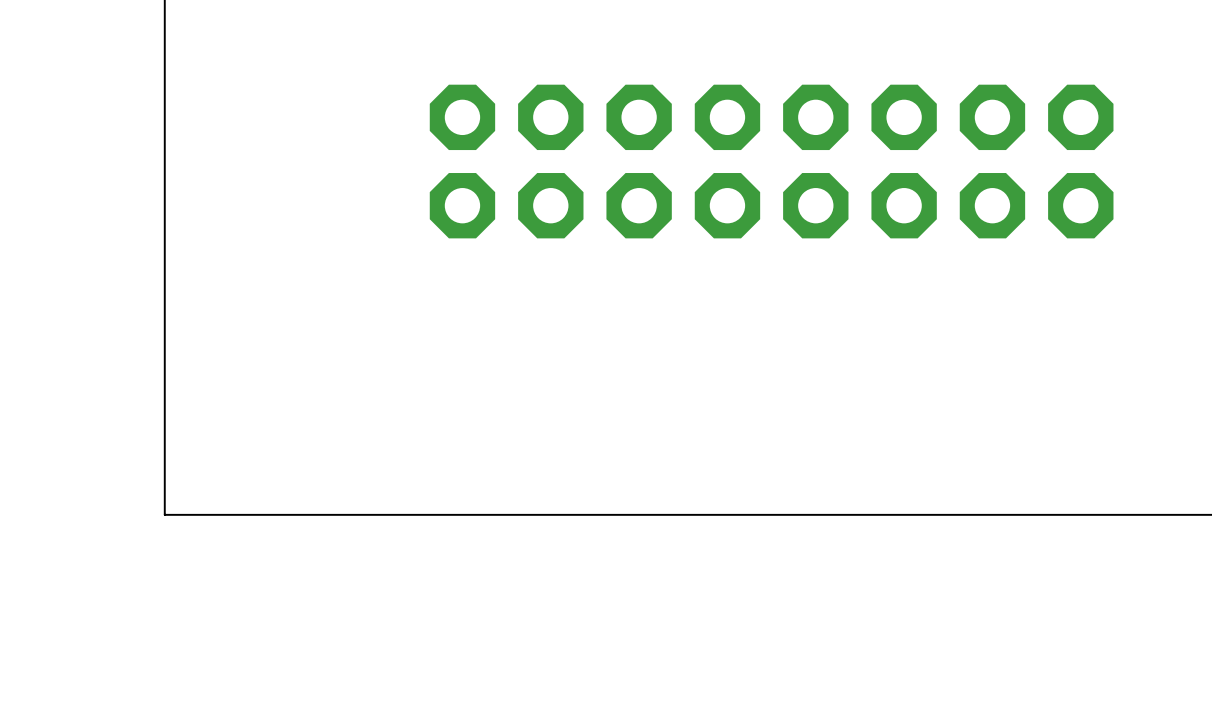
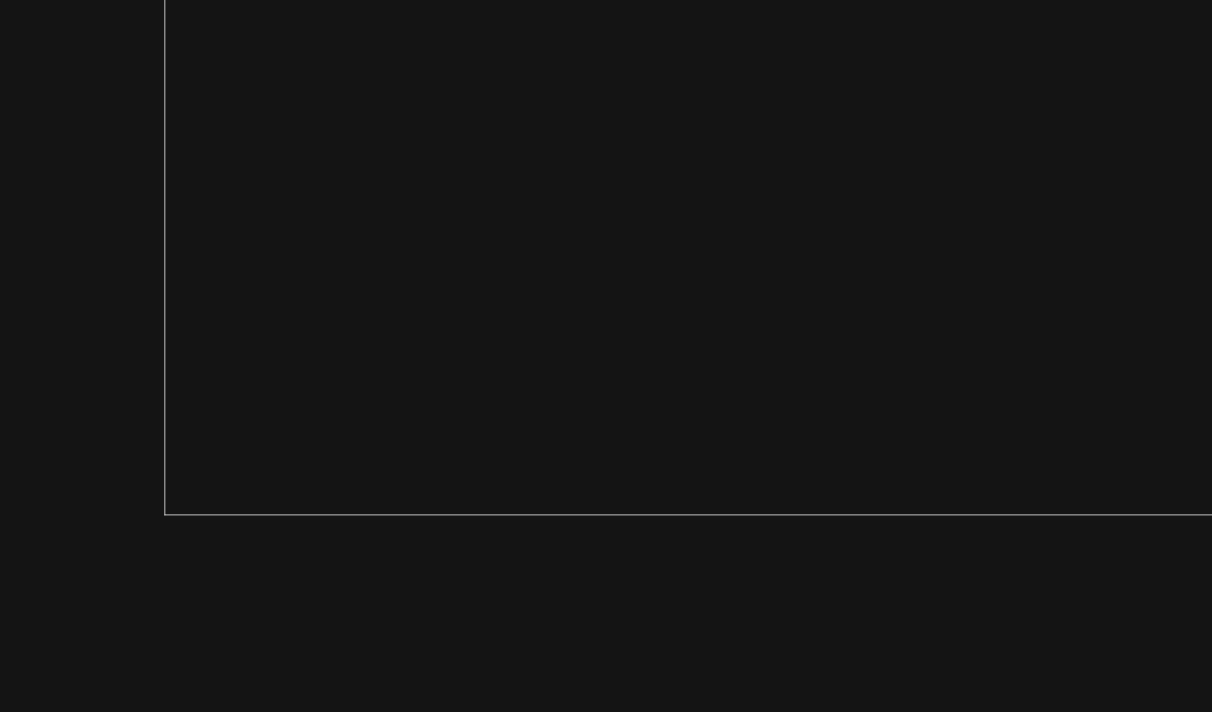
part: (771, 161) -> none

